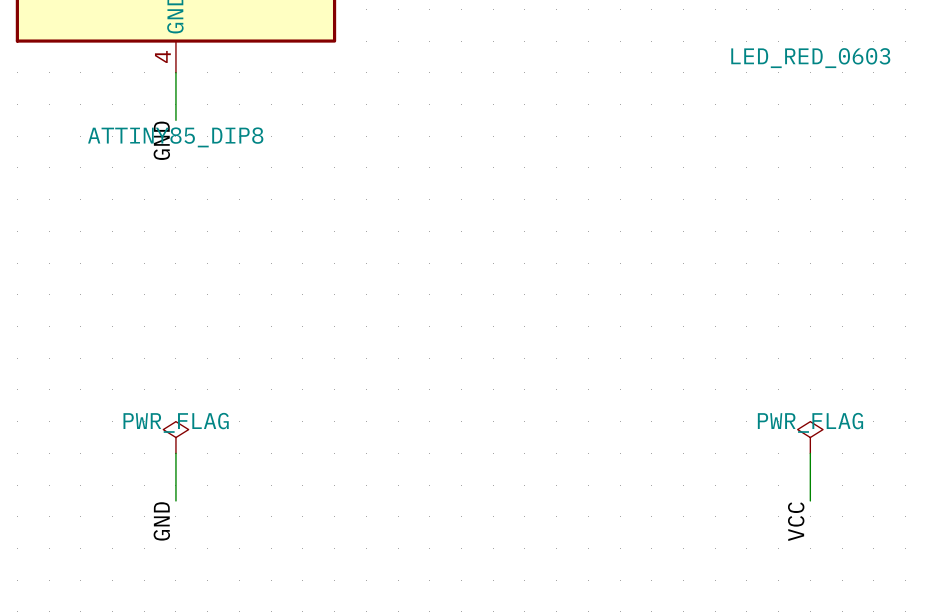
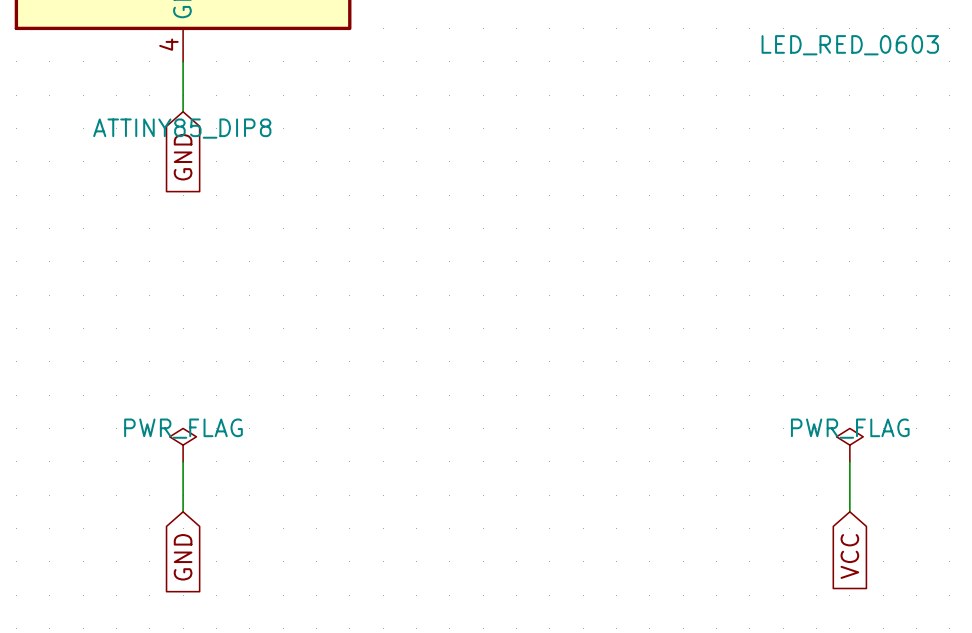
label: GND (161, 140) -> none
global label: none -> GND (183, 157)
label: GND (161, 521) -> none
label: VCC (796, 521) -> none
global label: none -> GND (183, 557)
global label: none -> VCC (849, 556)

